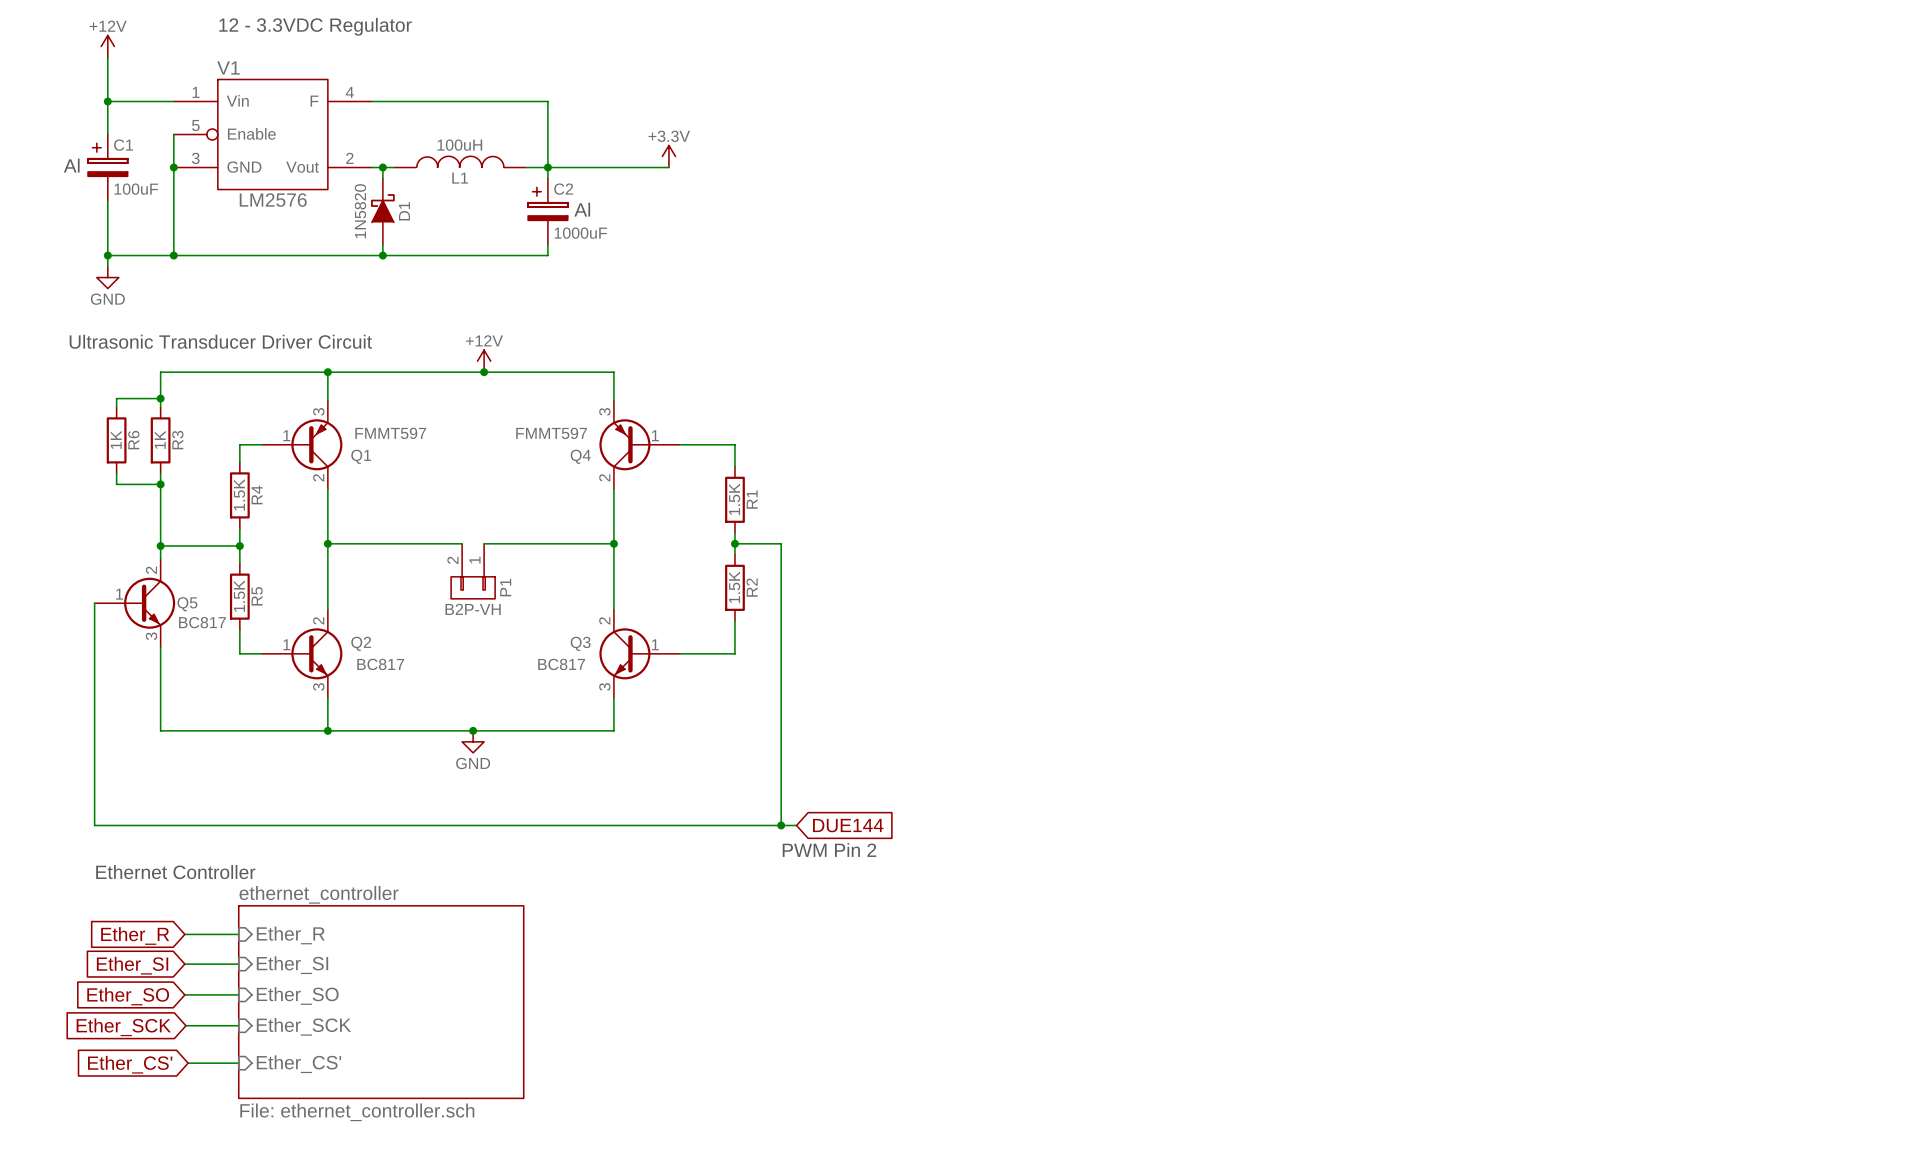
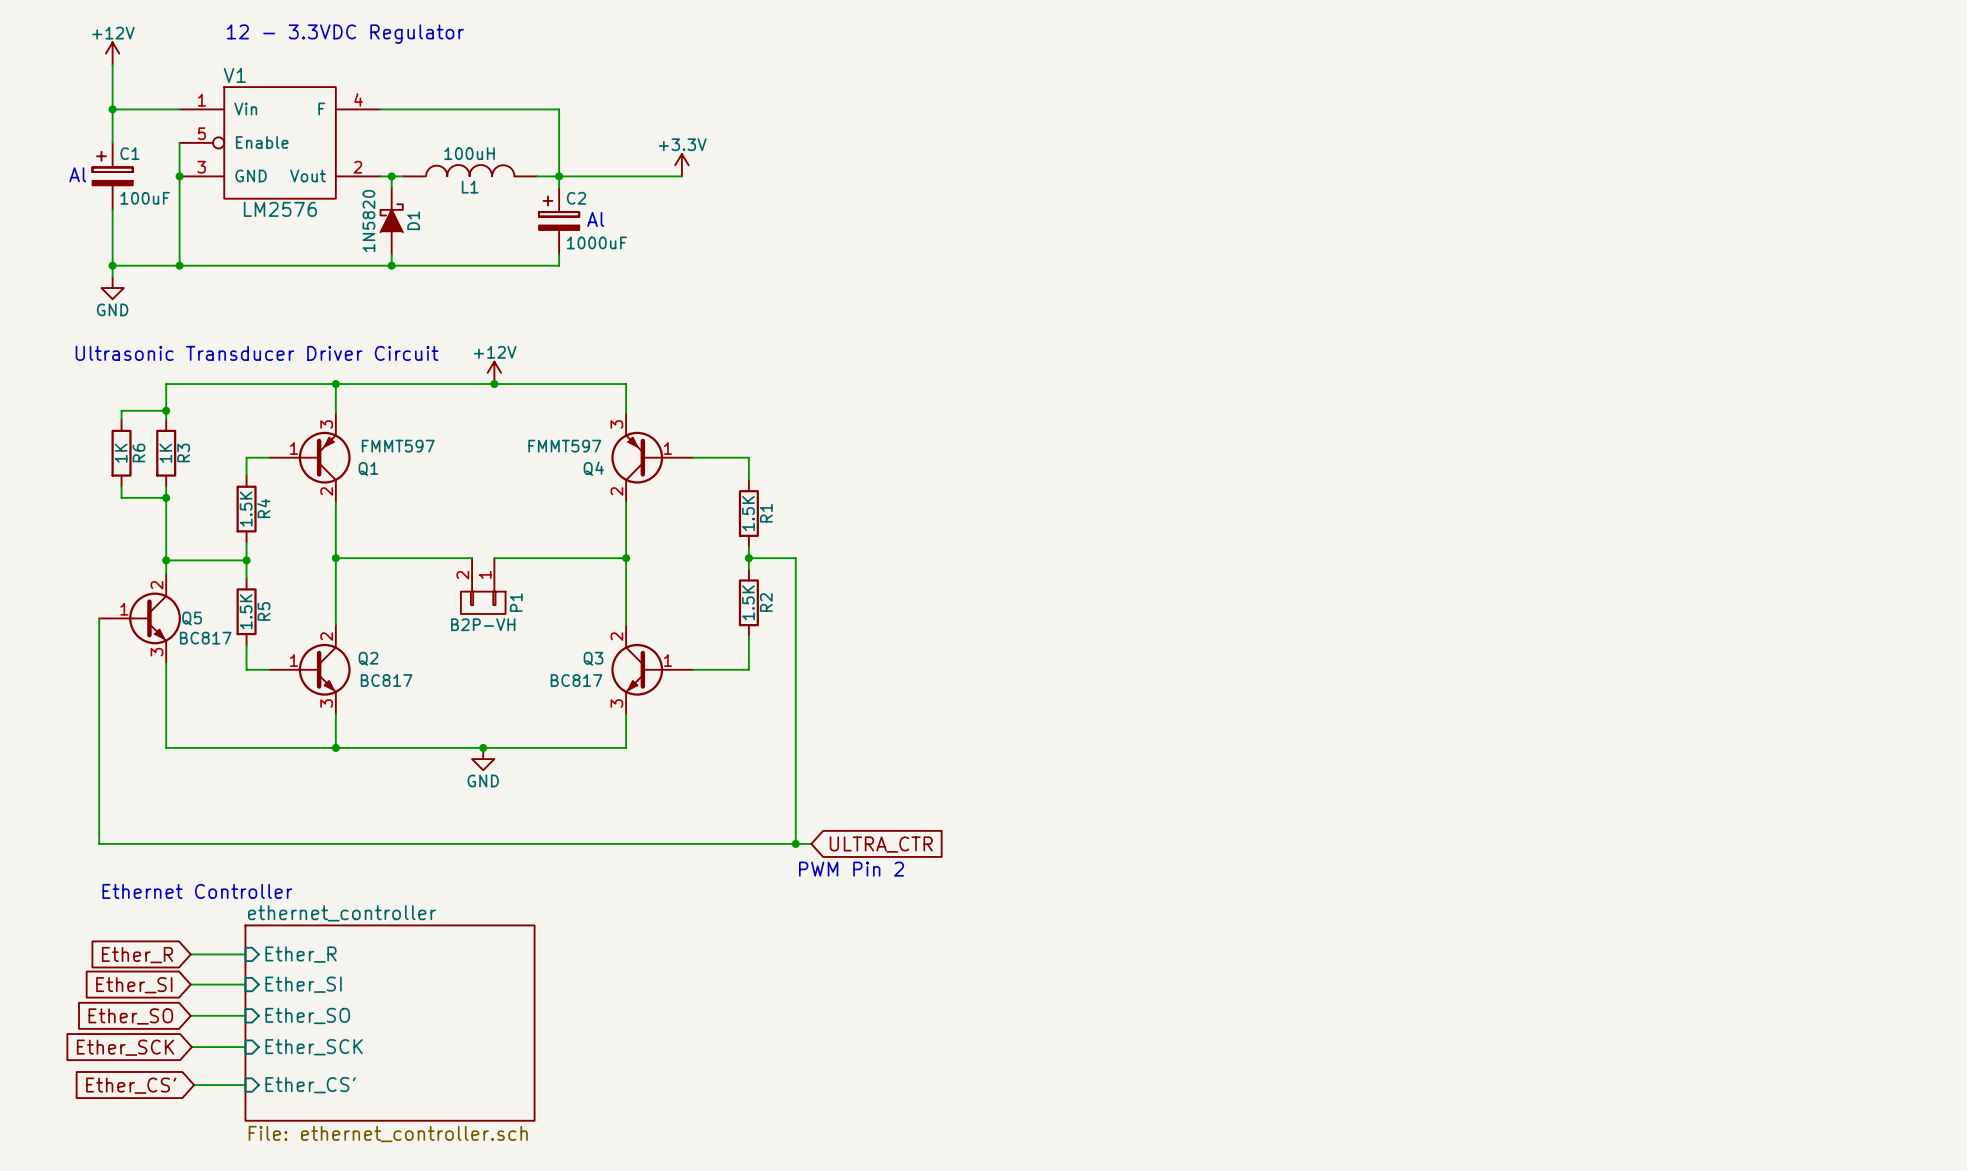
global label: DUE144 (848, 825) -> ULTRA_CTR (881, 844)

